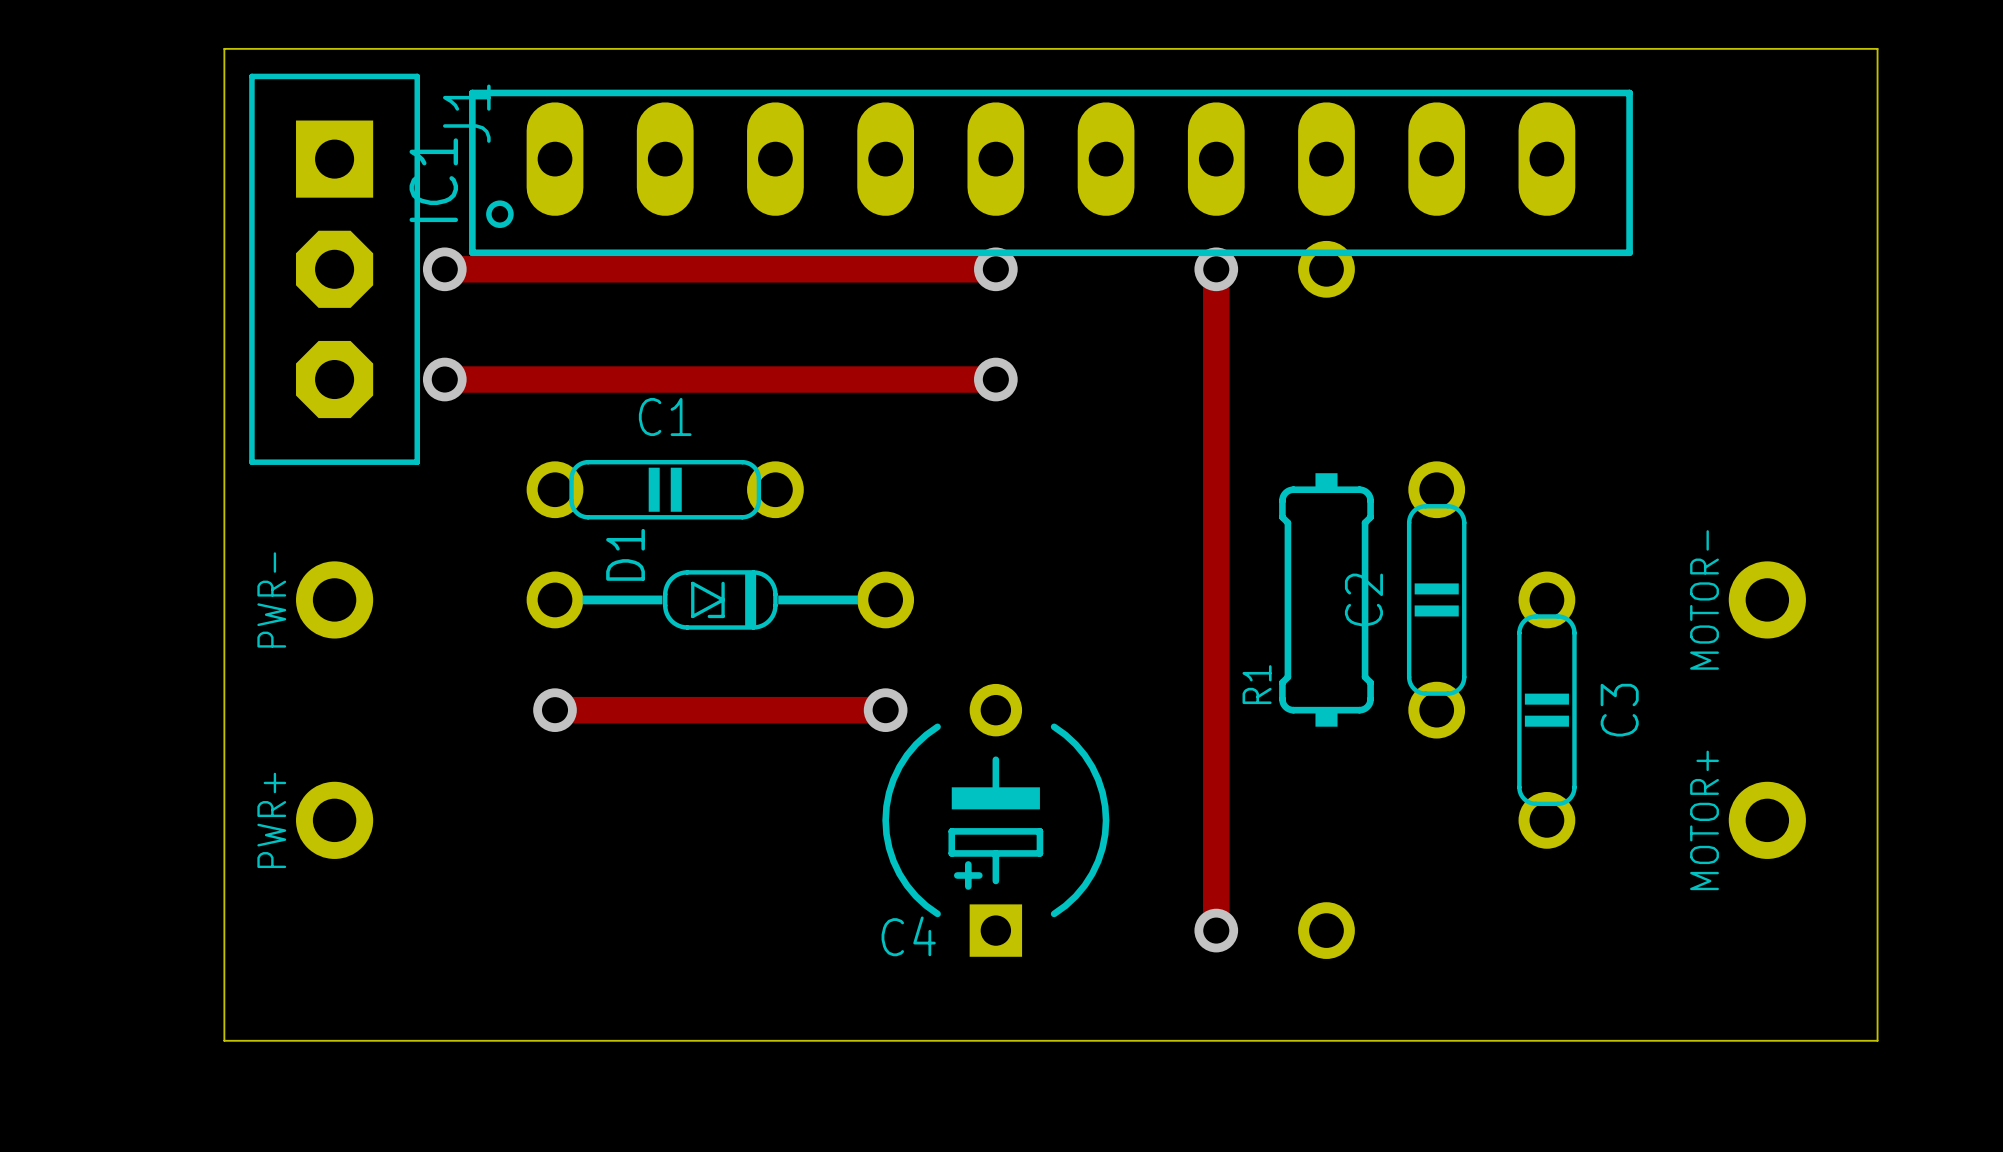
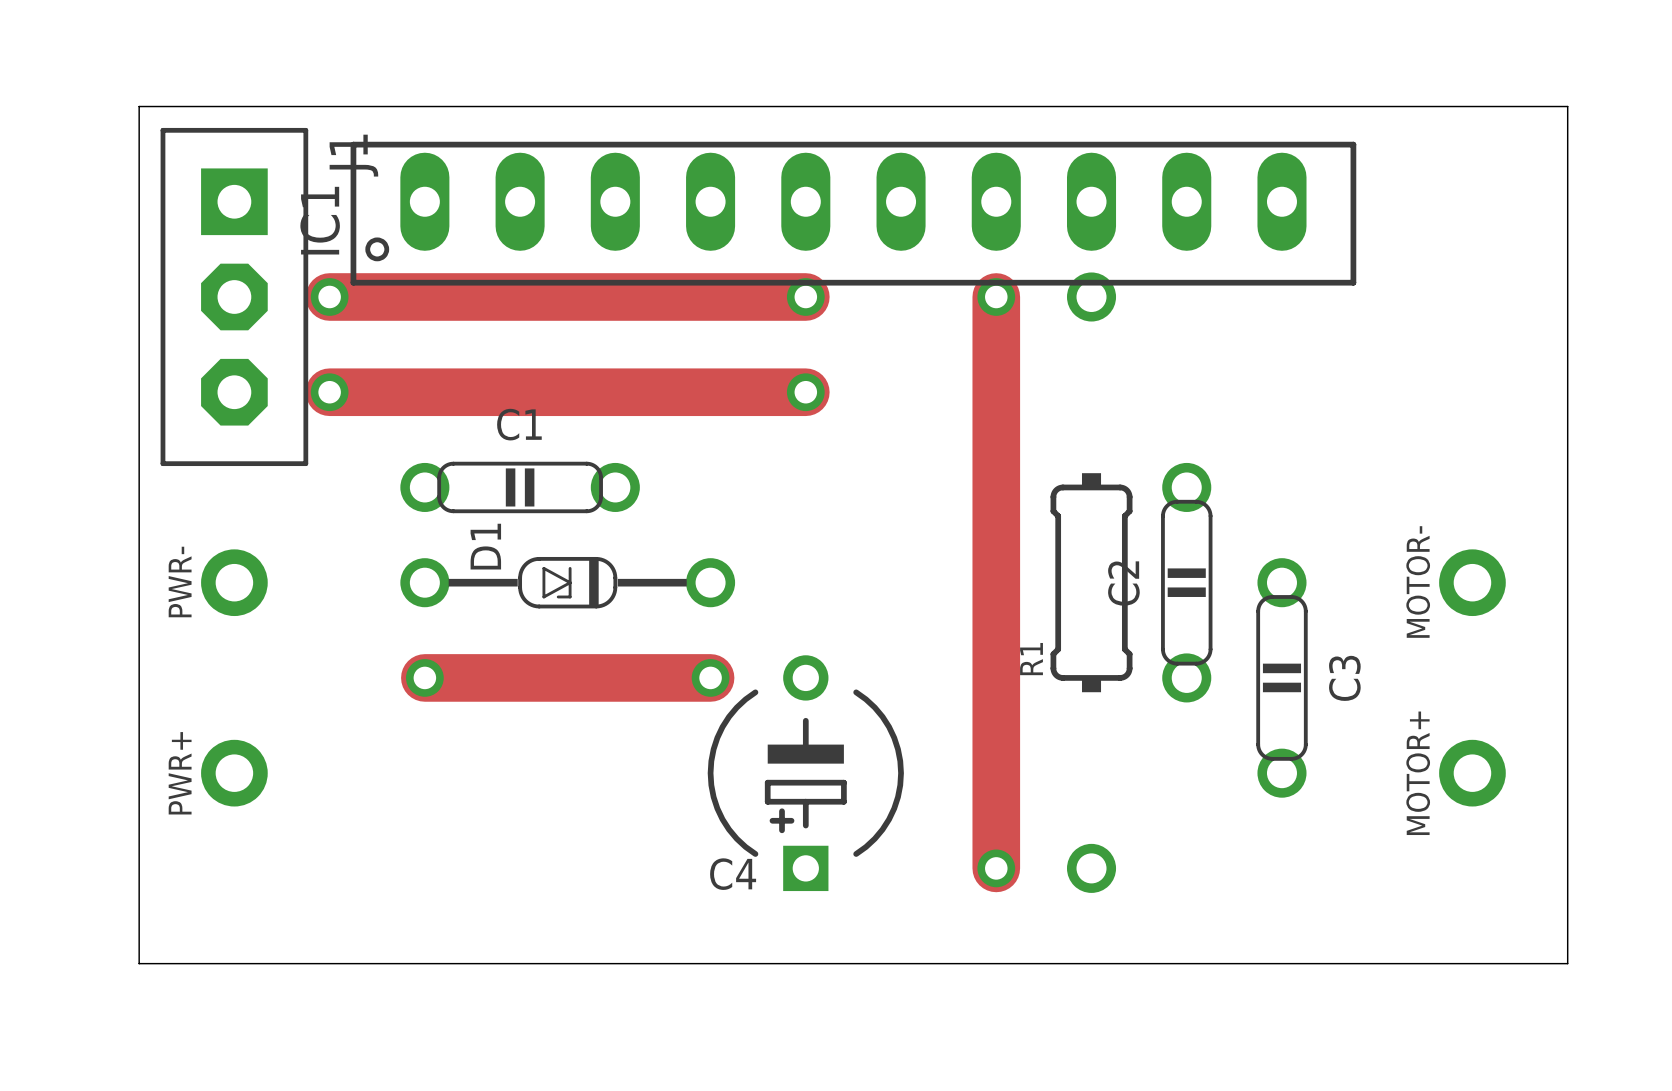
track width: thin (444, 269) (995, 269) -> thick (329, 296) (805, 296)
track width: thin (1216, 269) (1216, 930) -> thick (996, 296) (996, 868)
track width: thin (444, 379) (995, 379) -> thick (329, 392) (805, 392)
track width: thin (555, 710) (885, 710) -> thick (424, 677) (710, 677)

